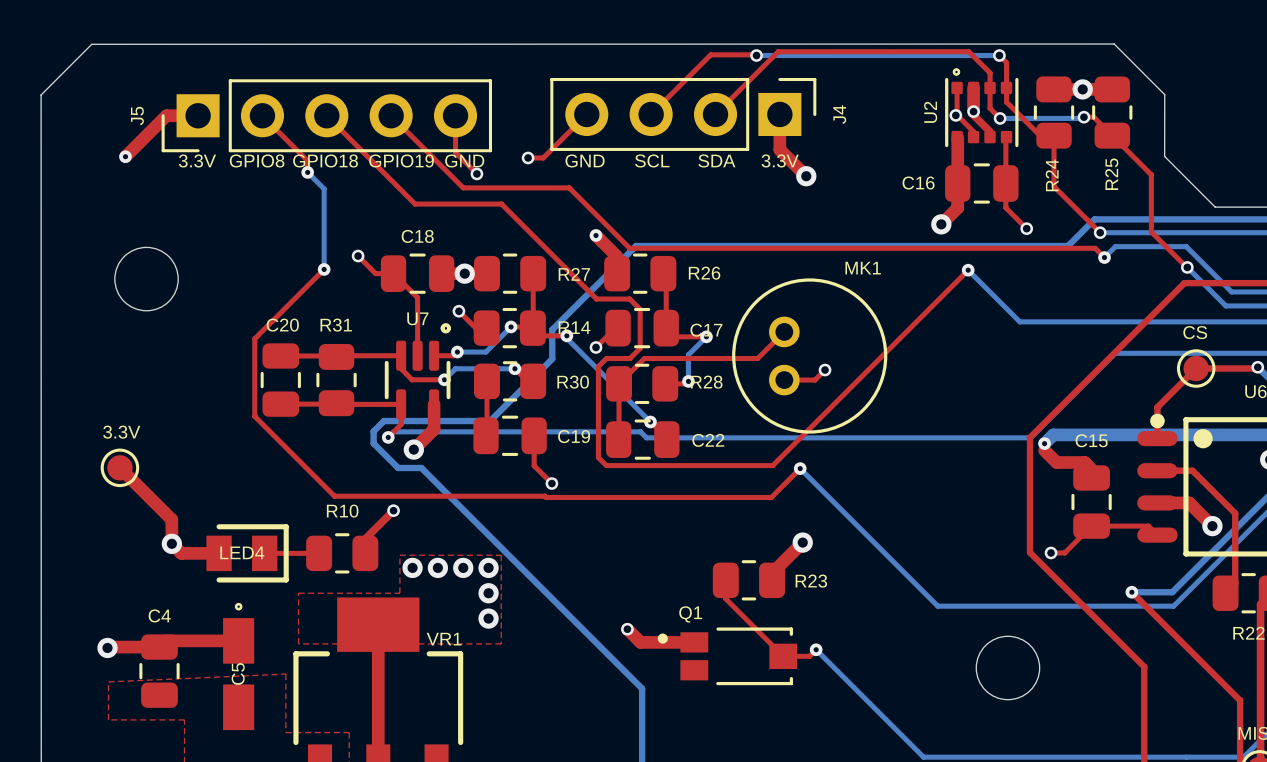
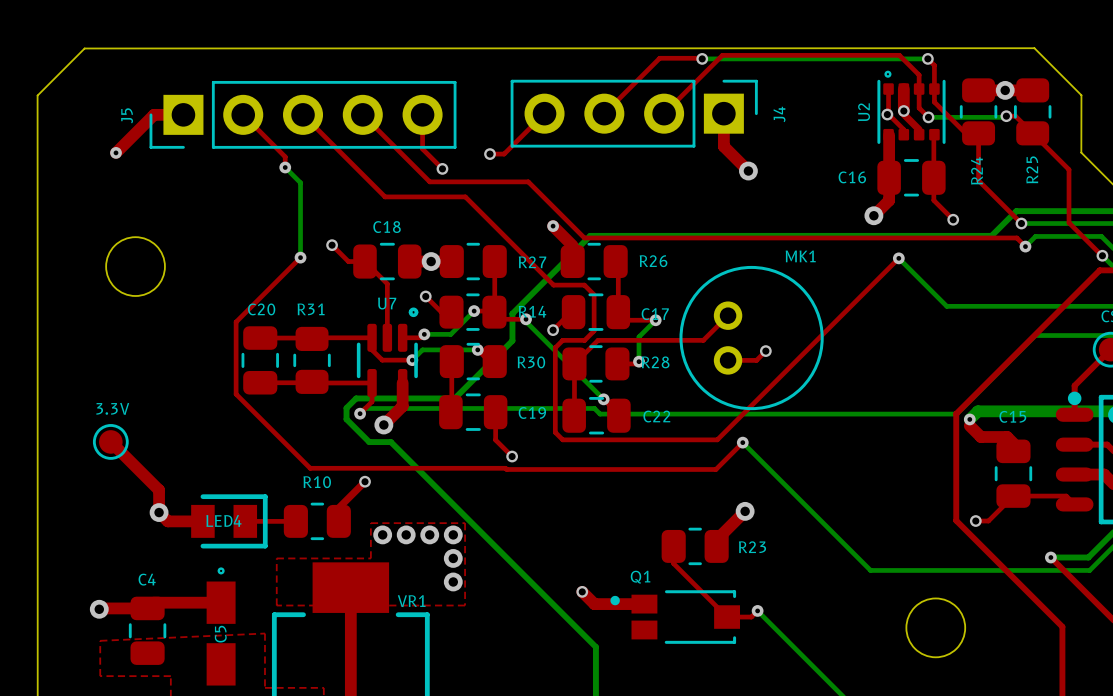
text: 3.3V (197, 160) -> none
text: GPIO8 (257, 160) -> none
text: GPIO18 (325, 160) -> none
text: GPIO19 (401, 160) -> none
text: GND (464, 160) -> none
text: GND (585, 160) -> none
text: SCL (652, 160) -> none
text: SDA (716, 160) -> none
text: 3.3V (780, 160) -> none

